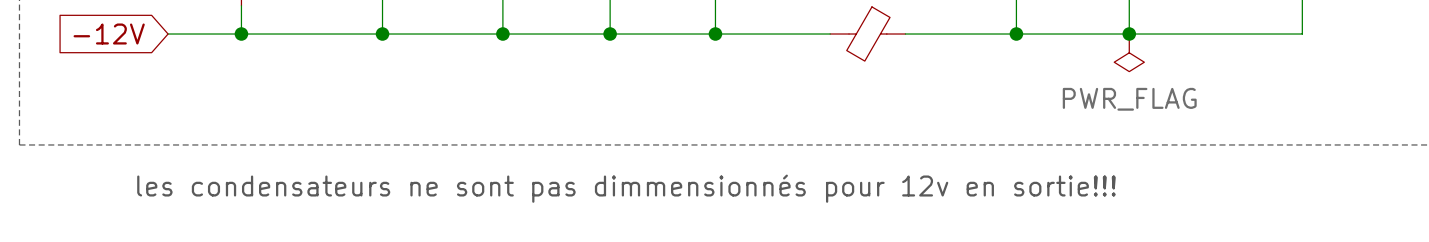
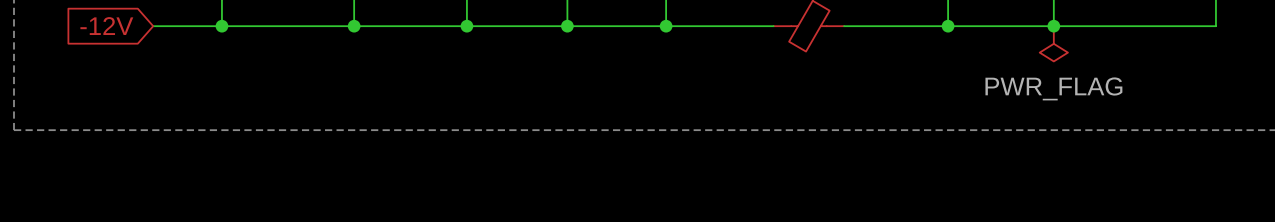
text: les condensateurs ne sont pas dimmensionnés pour 12v en sortie!!! (626, 188) -> none

